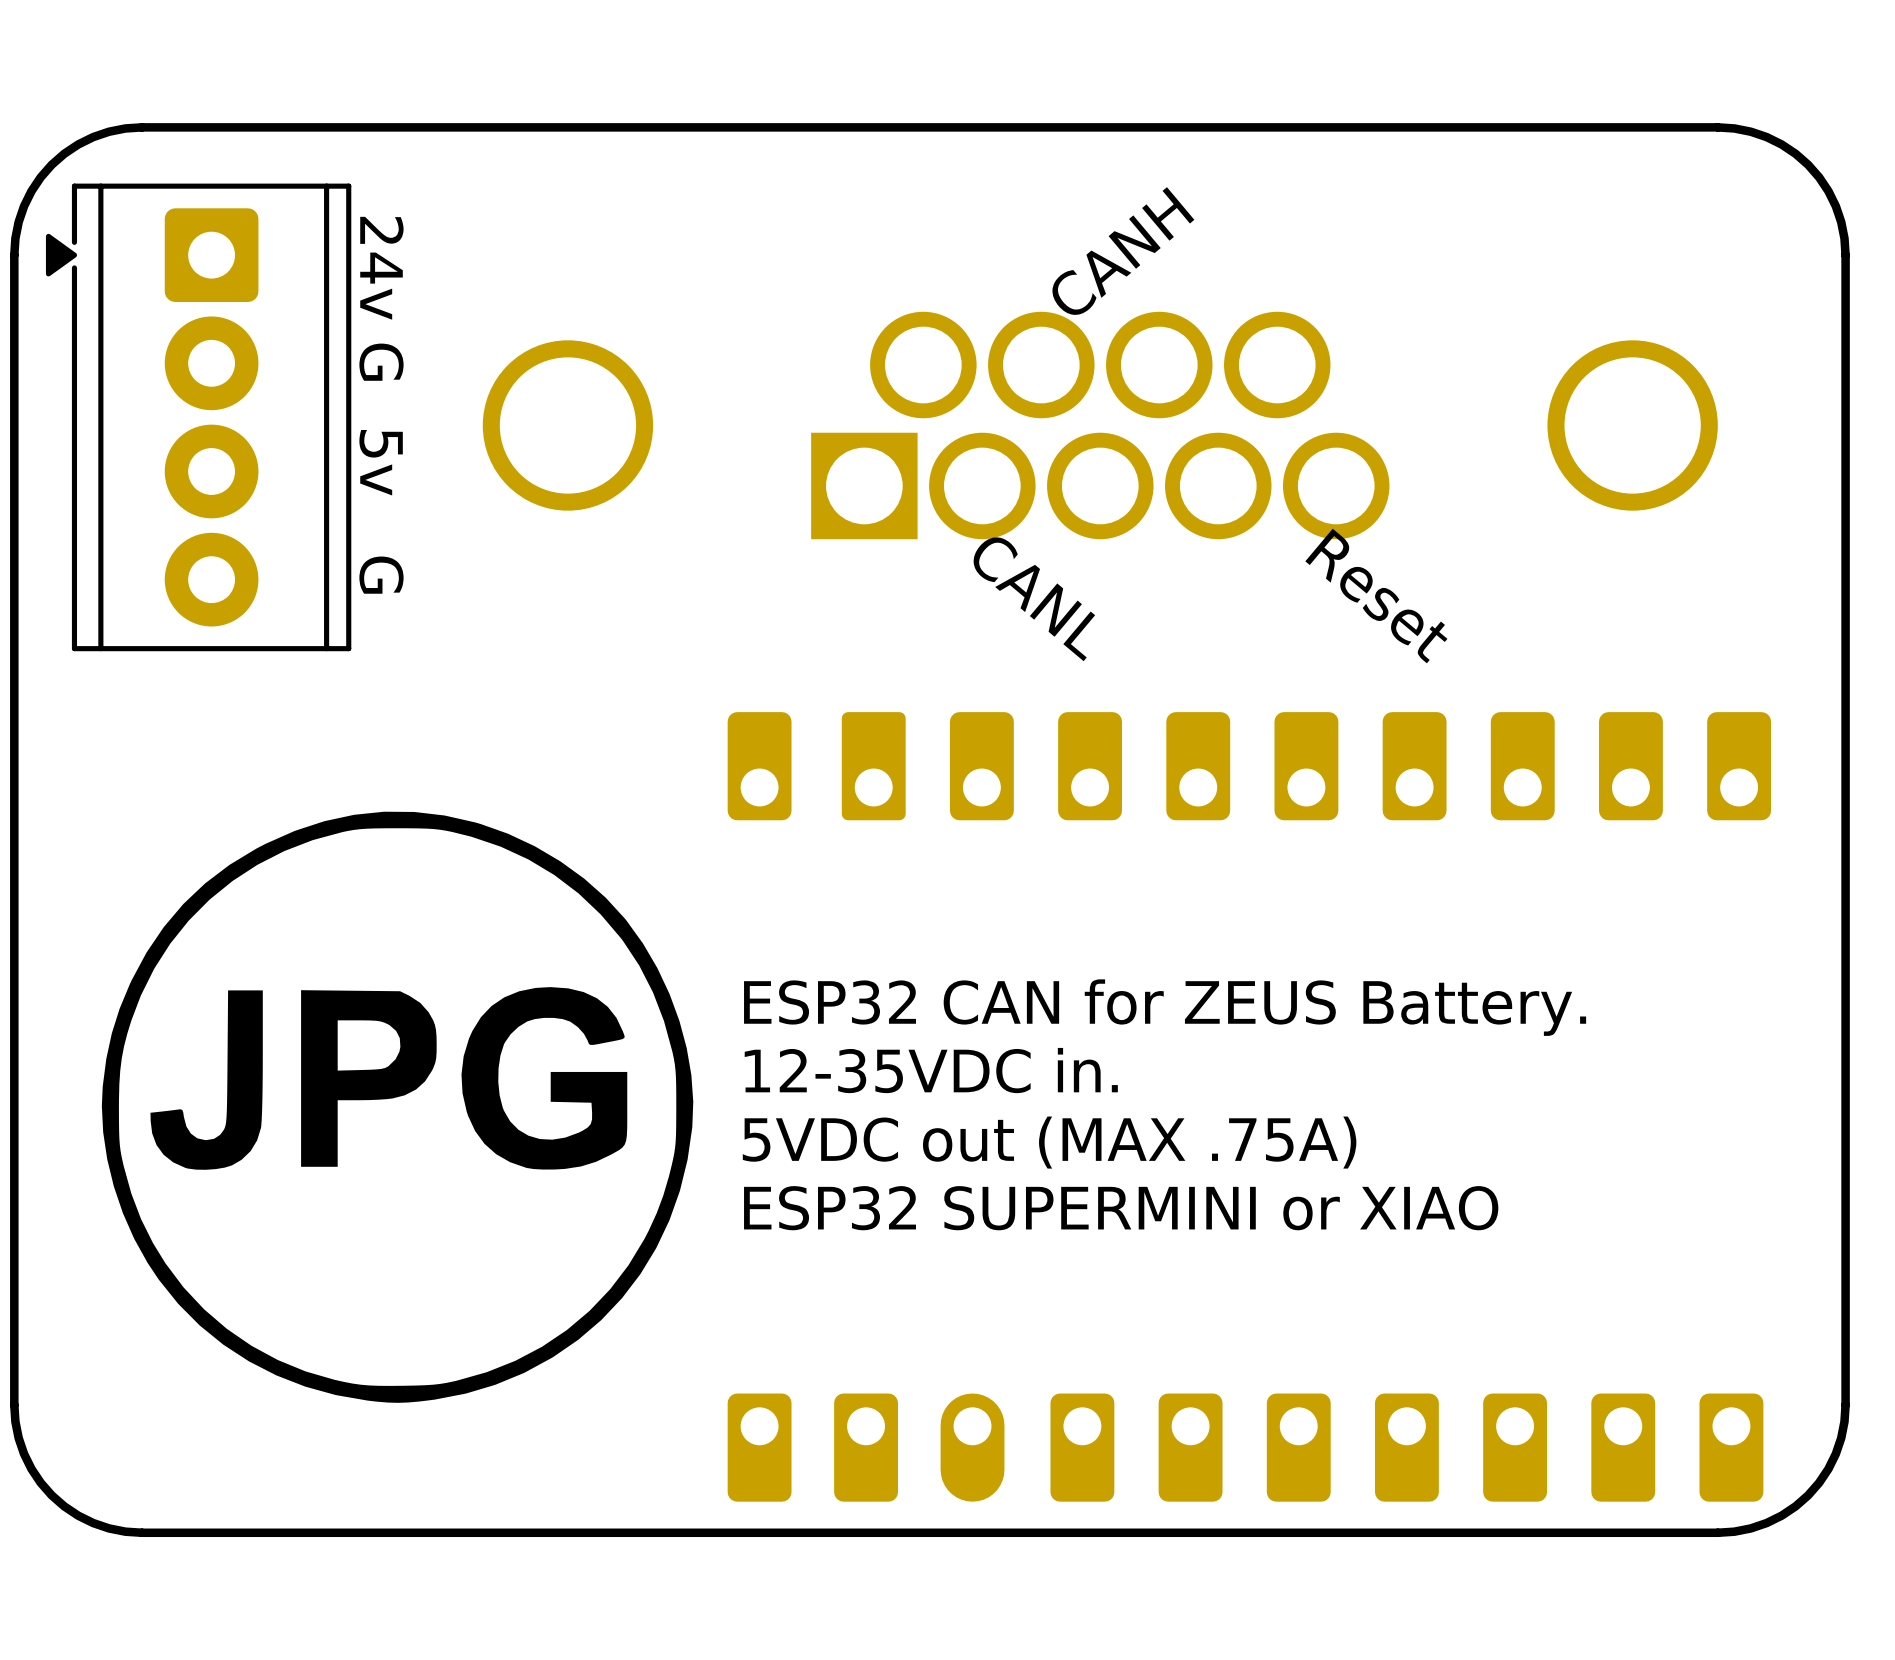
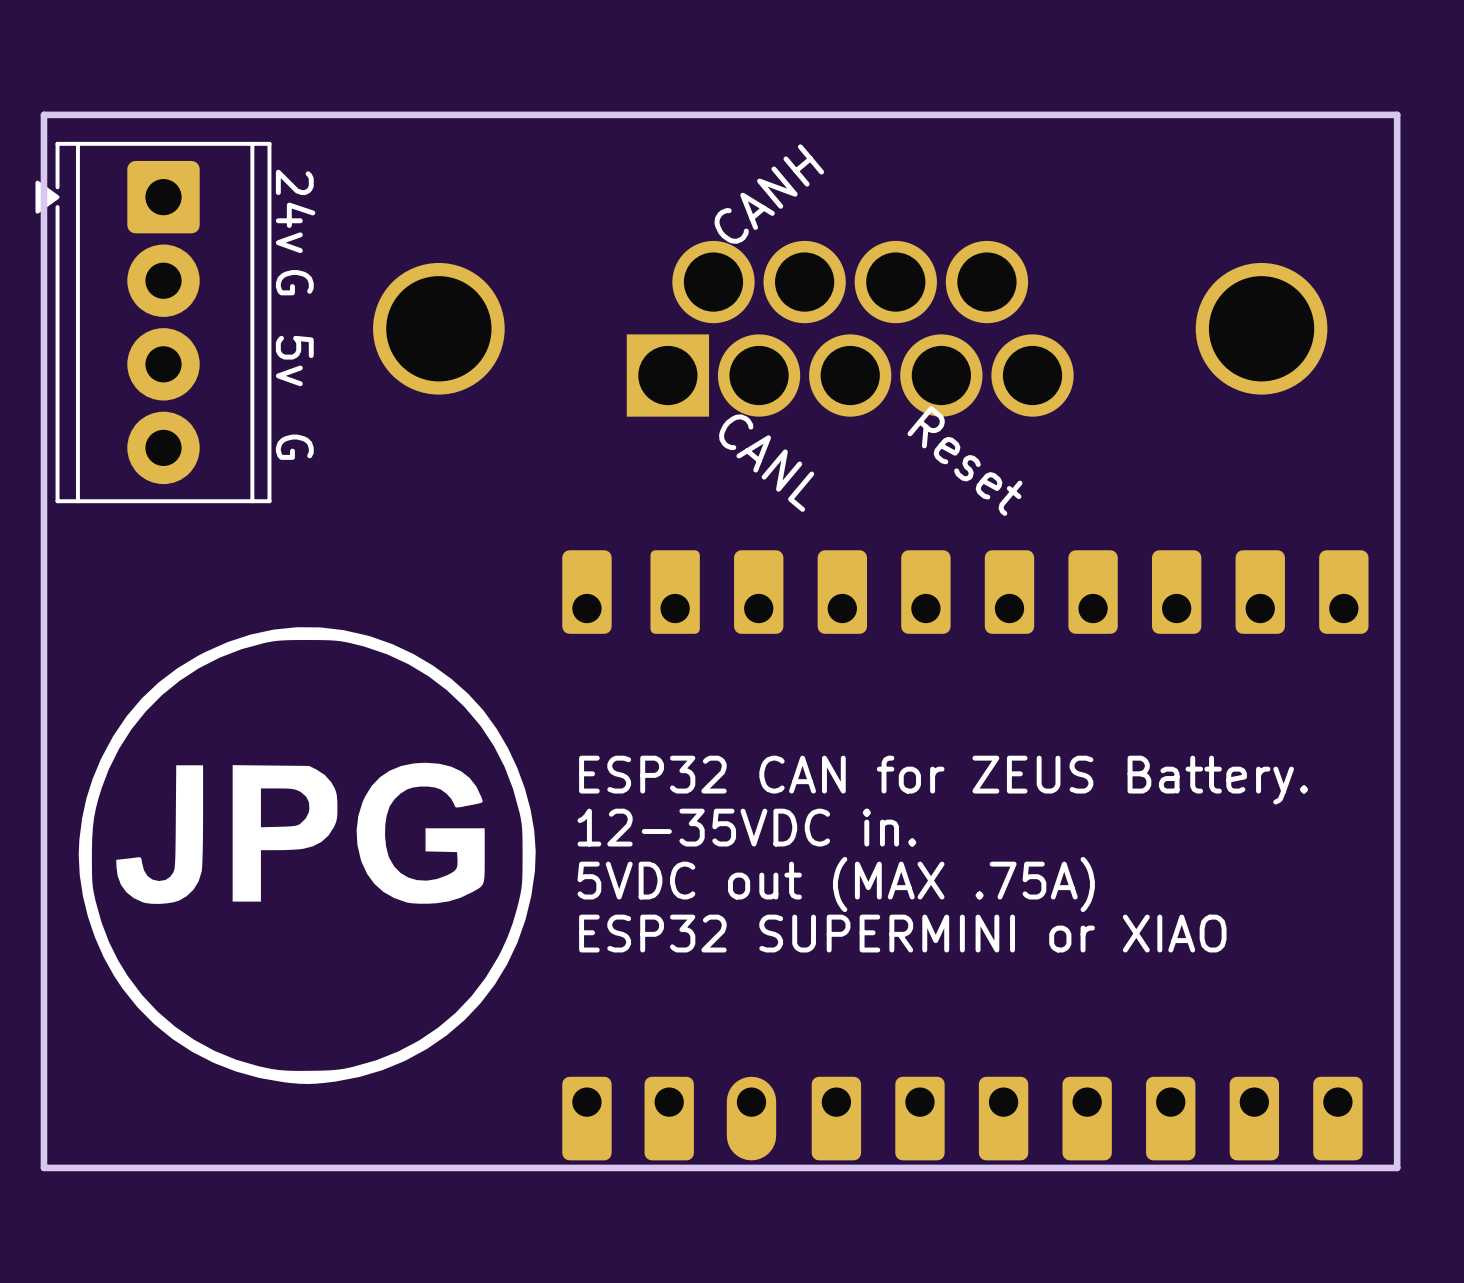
board edge: (1717, 127) (142, 127) (109, 131) (78, 144) (64, 153) (40, 177) (31, 191) (18, 222) (14, 255) (14, 1405) (18, 1438) (31, 1468) (40, 1482) (51, 1495) (78, 1515) (109, 1528) (142, 1532) (1717, 1532) (1750, 1528) (1781, 1515) (1795, 1506) (1819, 1482) (1835, 1453) (1844, 1421) (1845, 1405) (1845, 255) (1844, 238) (1835, 206) (1819, 177) (1808, 164) (1781, 144) (1766, 137) (1750, 131) (1717, 127) -> (1397, 114) (1397, 1167) (43, 1167) (43, 114) (1397, 114)
text position: CANH (1123, 251) -> CANH (769, 194)
text position: Reset (1376, 596) -> Reset (964, 460)
text position: CANL (1034, 598) -> CANL (766, 463)

